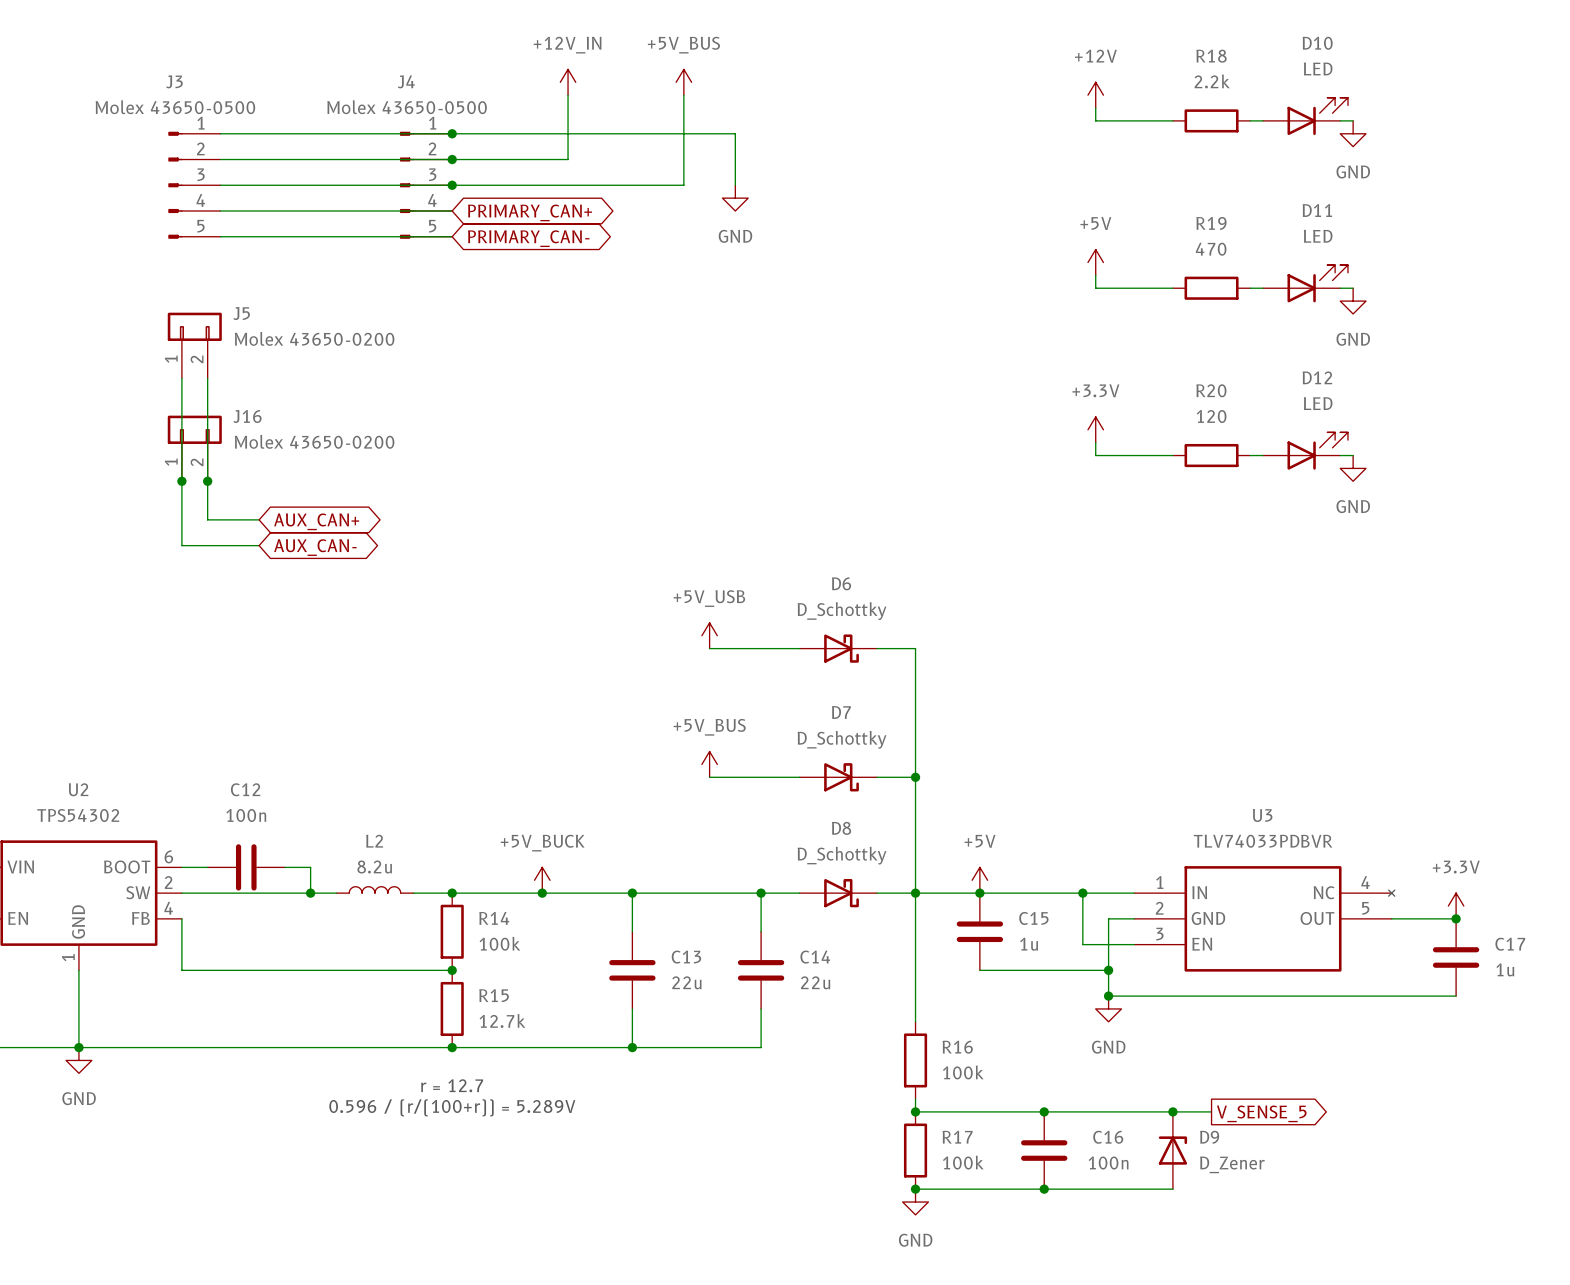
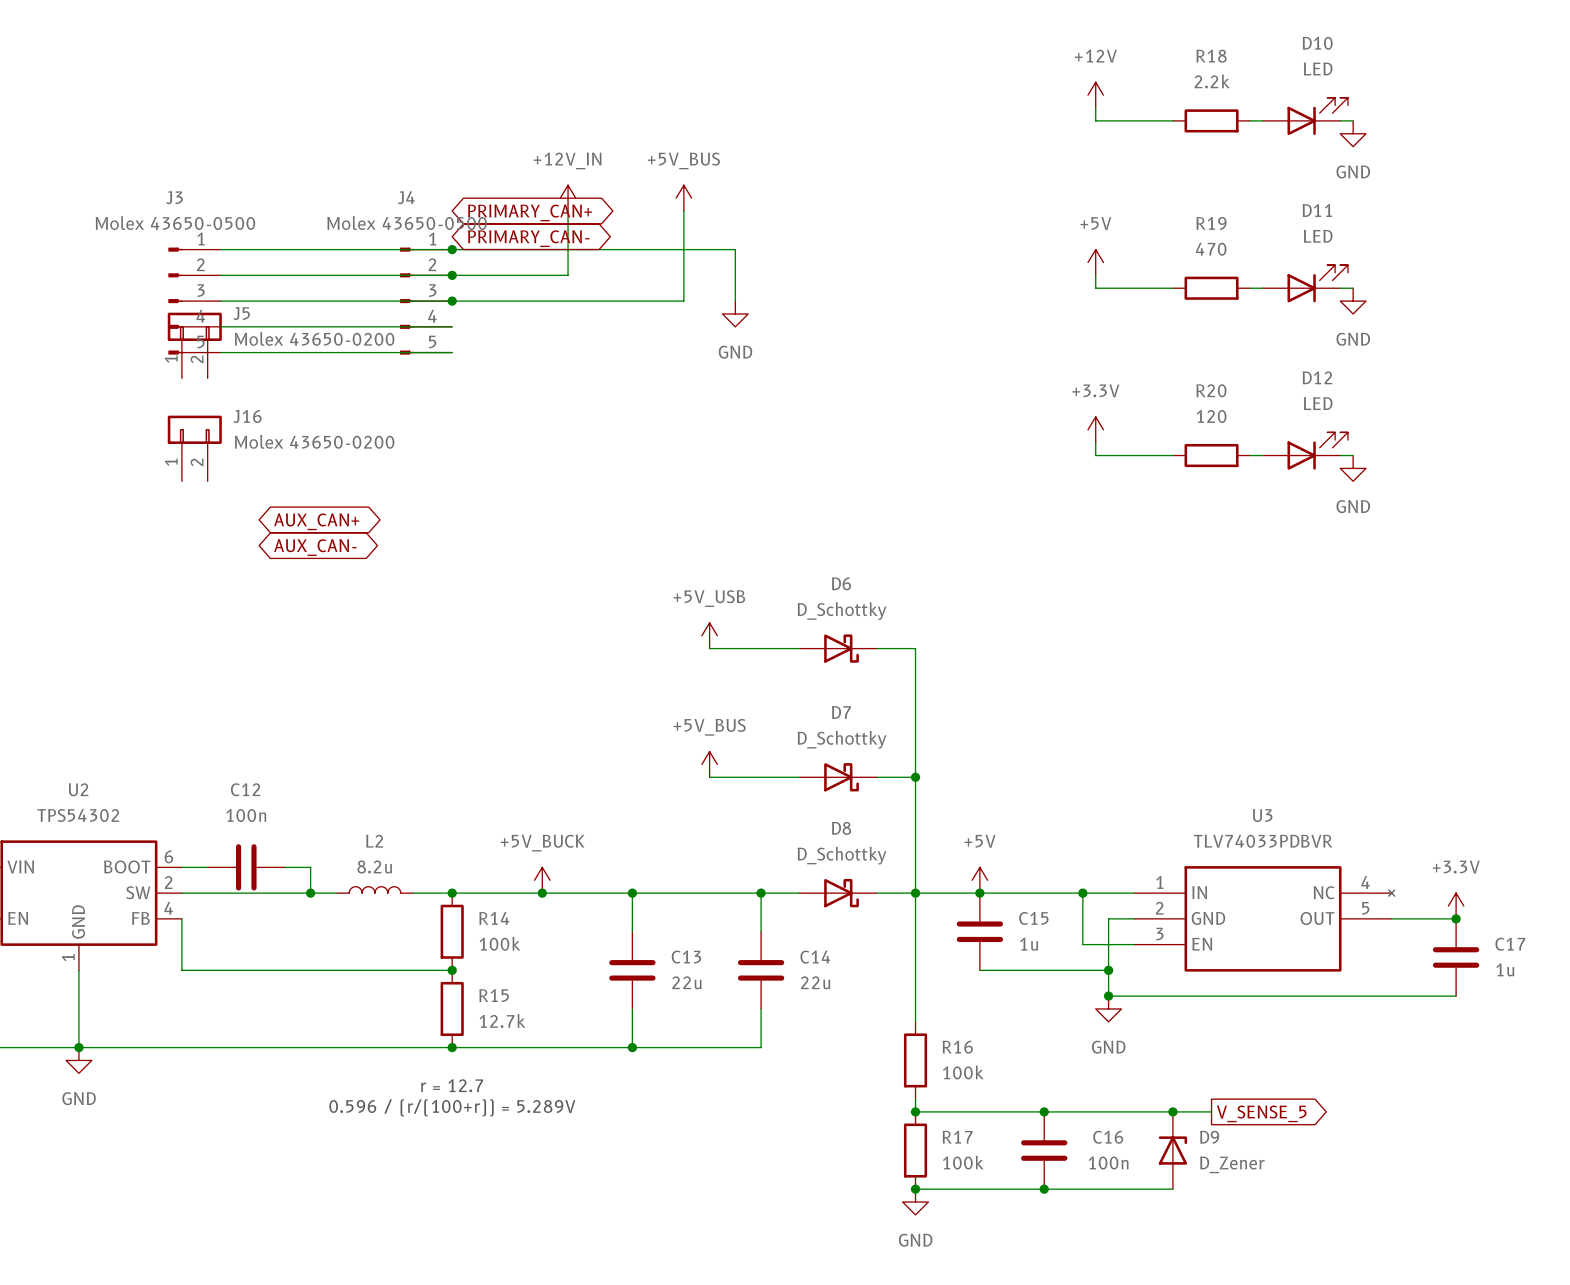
power symbol position: +12V_IN (568, 82) -> +12V_IN (568, 198)
power symbol position: +5V_BUS (683, 82) -> +5V_BUS (683, 198)
wire: (568, 95) (568, 159) (220, 159) -> (568, 211) (568, 275) (220, 275)
wire: (683, 95) (683, 185) (220, 185) -> (683, 211) (683, 301) (220, 301)
wire: (220, 133) (735, 133) (735, 185) -> (220, 249) (735, 249) (735, 301)
junction: (452, 133) -> none
junction: (452, 159) -> none
J3 position: (194, 185) -> (194, 301)
J4 position: (426, 185) -> (426, 301)
junction: (452, 185) -> none
power symbol position: GND (735, 198) -> GND (735, 313)
wire: (220, 211) (452, 211) -> (220, 326) (452, 326)
wire: (220, 236) (452, 236) -> (220, 352) (452, 352)
junction: none -> (452, 249)
junction: none -> (452, 275)
junction: none -> (452, 301)
wire: (181, 378) (181, 545) (259, 545) -> none
wire: (207, 378) (207, 519) (259, 519) -> none
junction: (181, 481) -> none
junction: (207, 481) -> none

